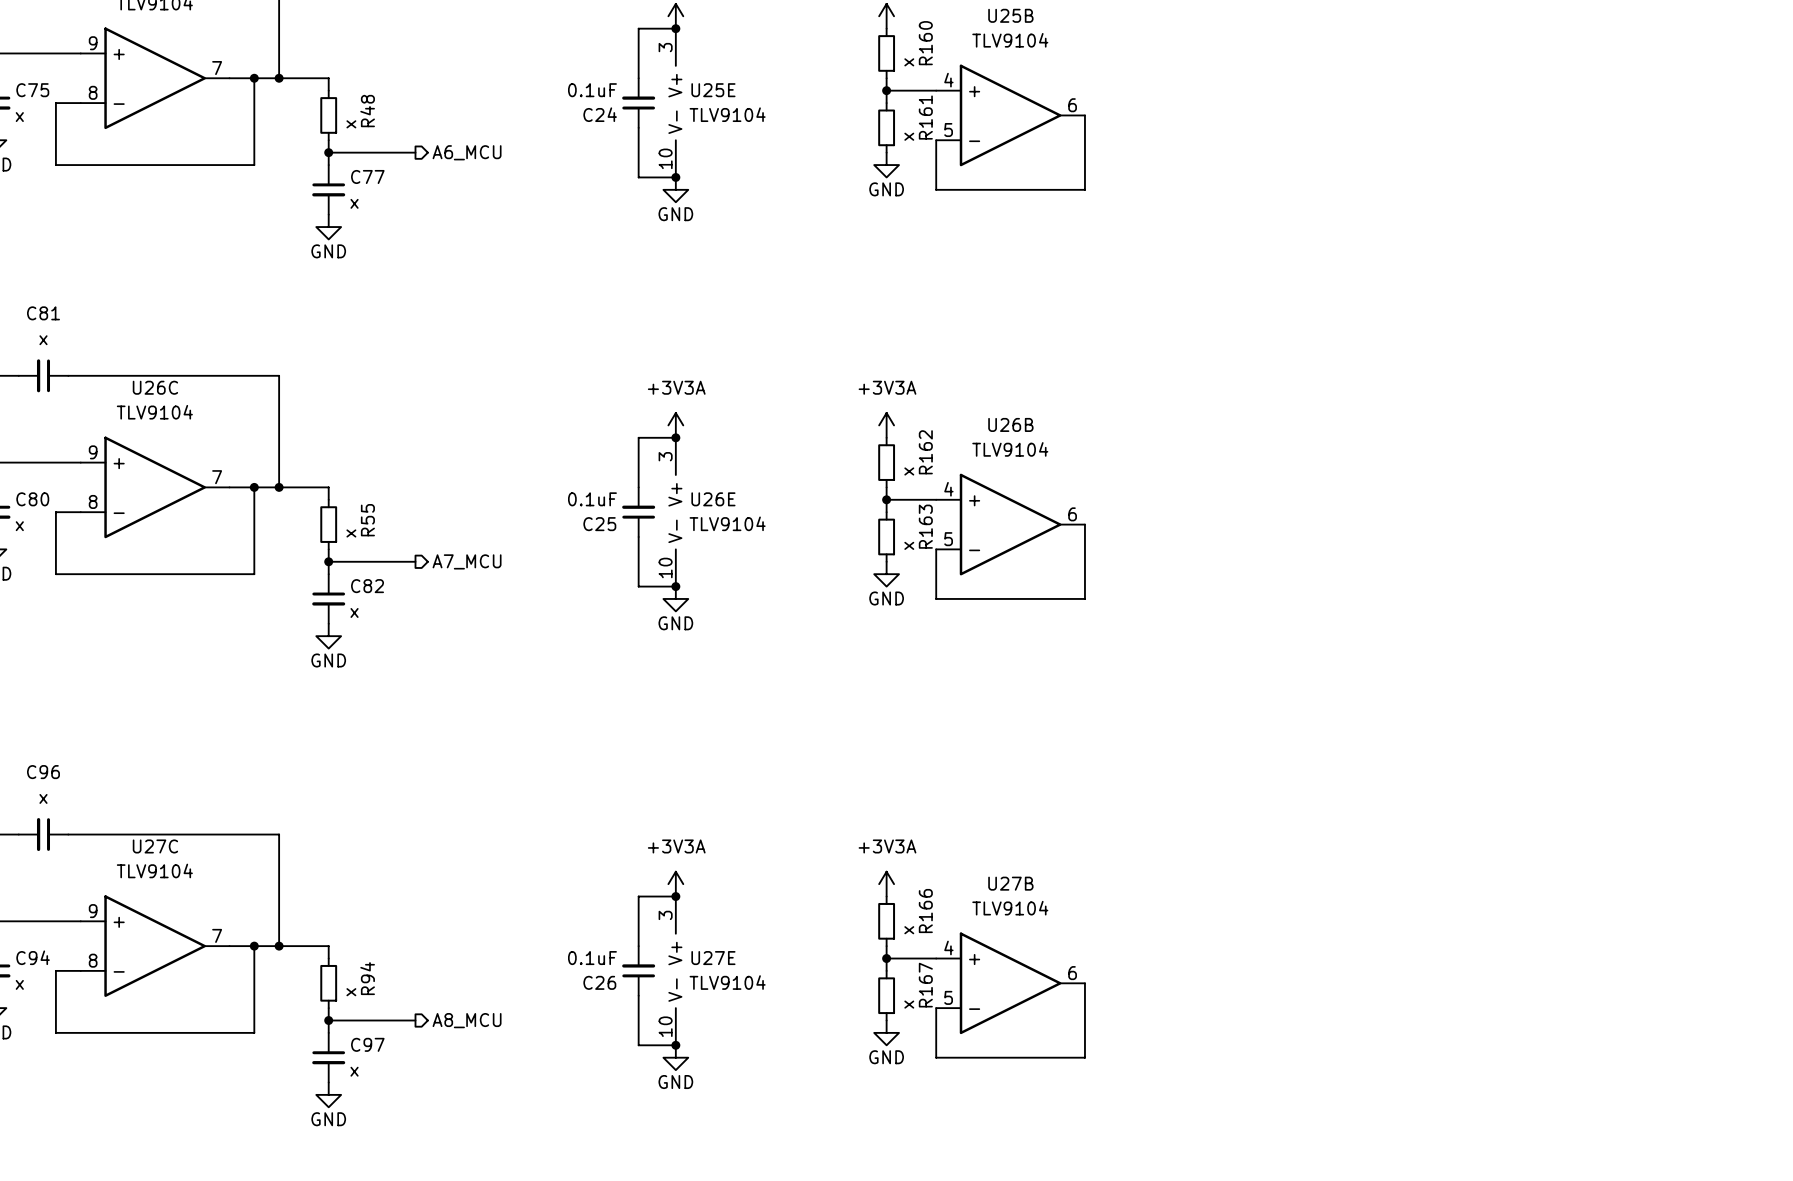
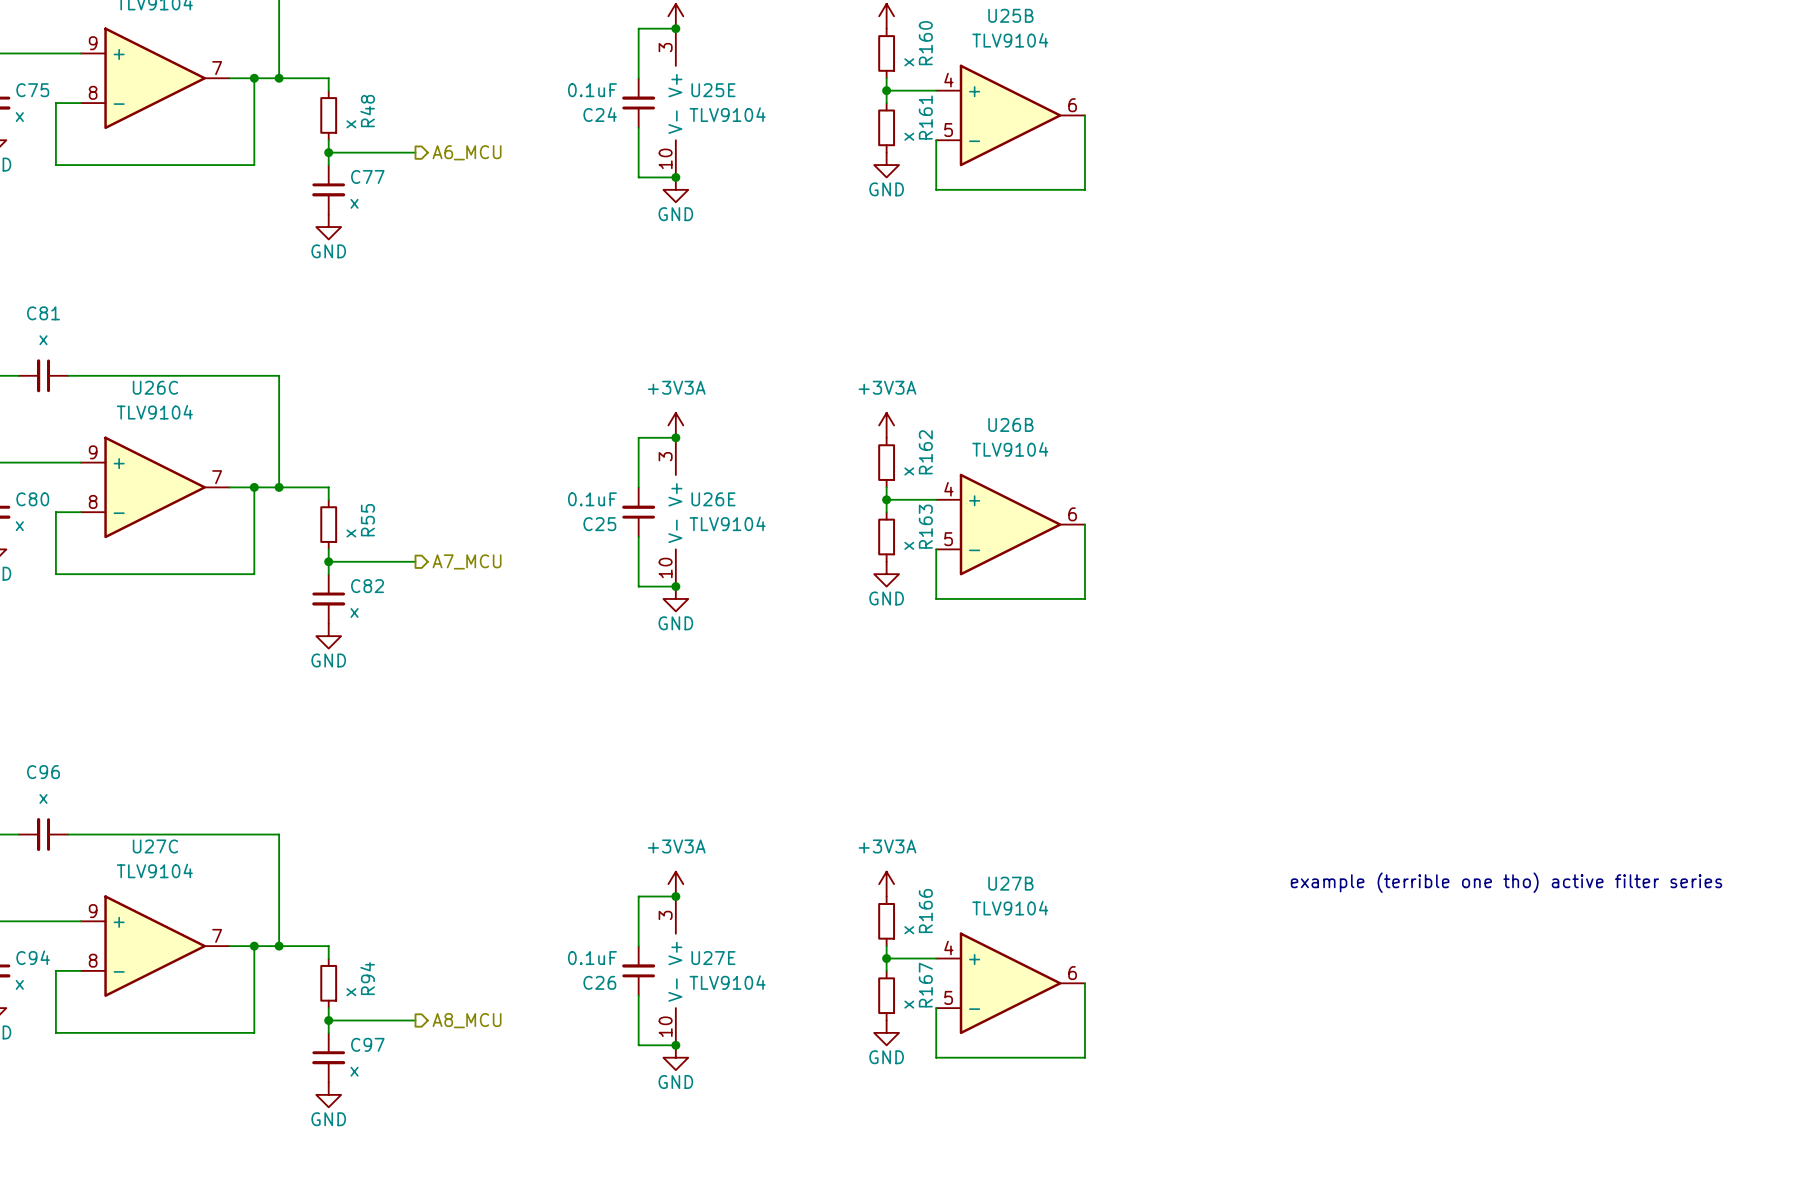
text: none -> example (terrible one tho) active filter series (1506, 882)

